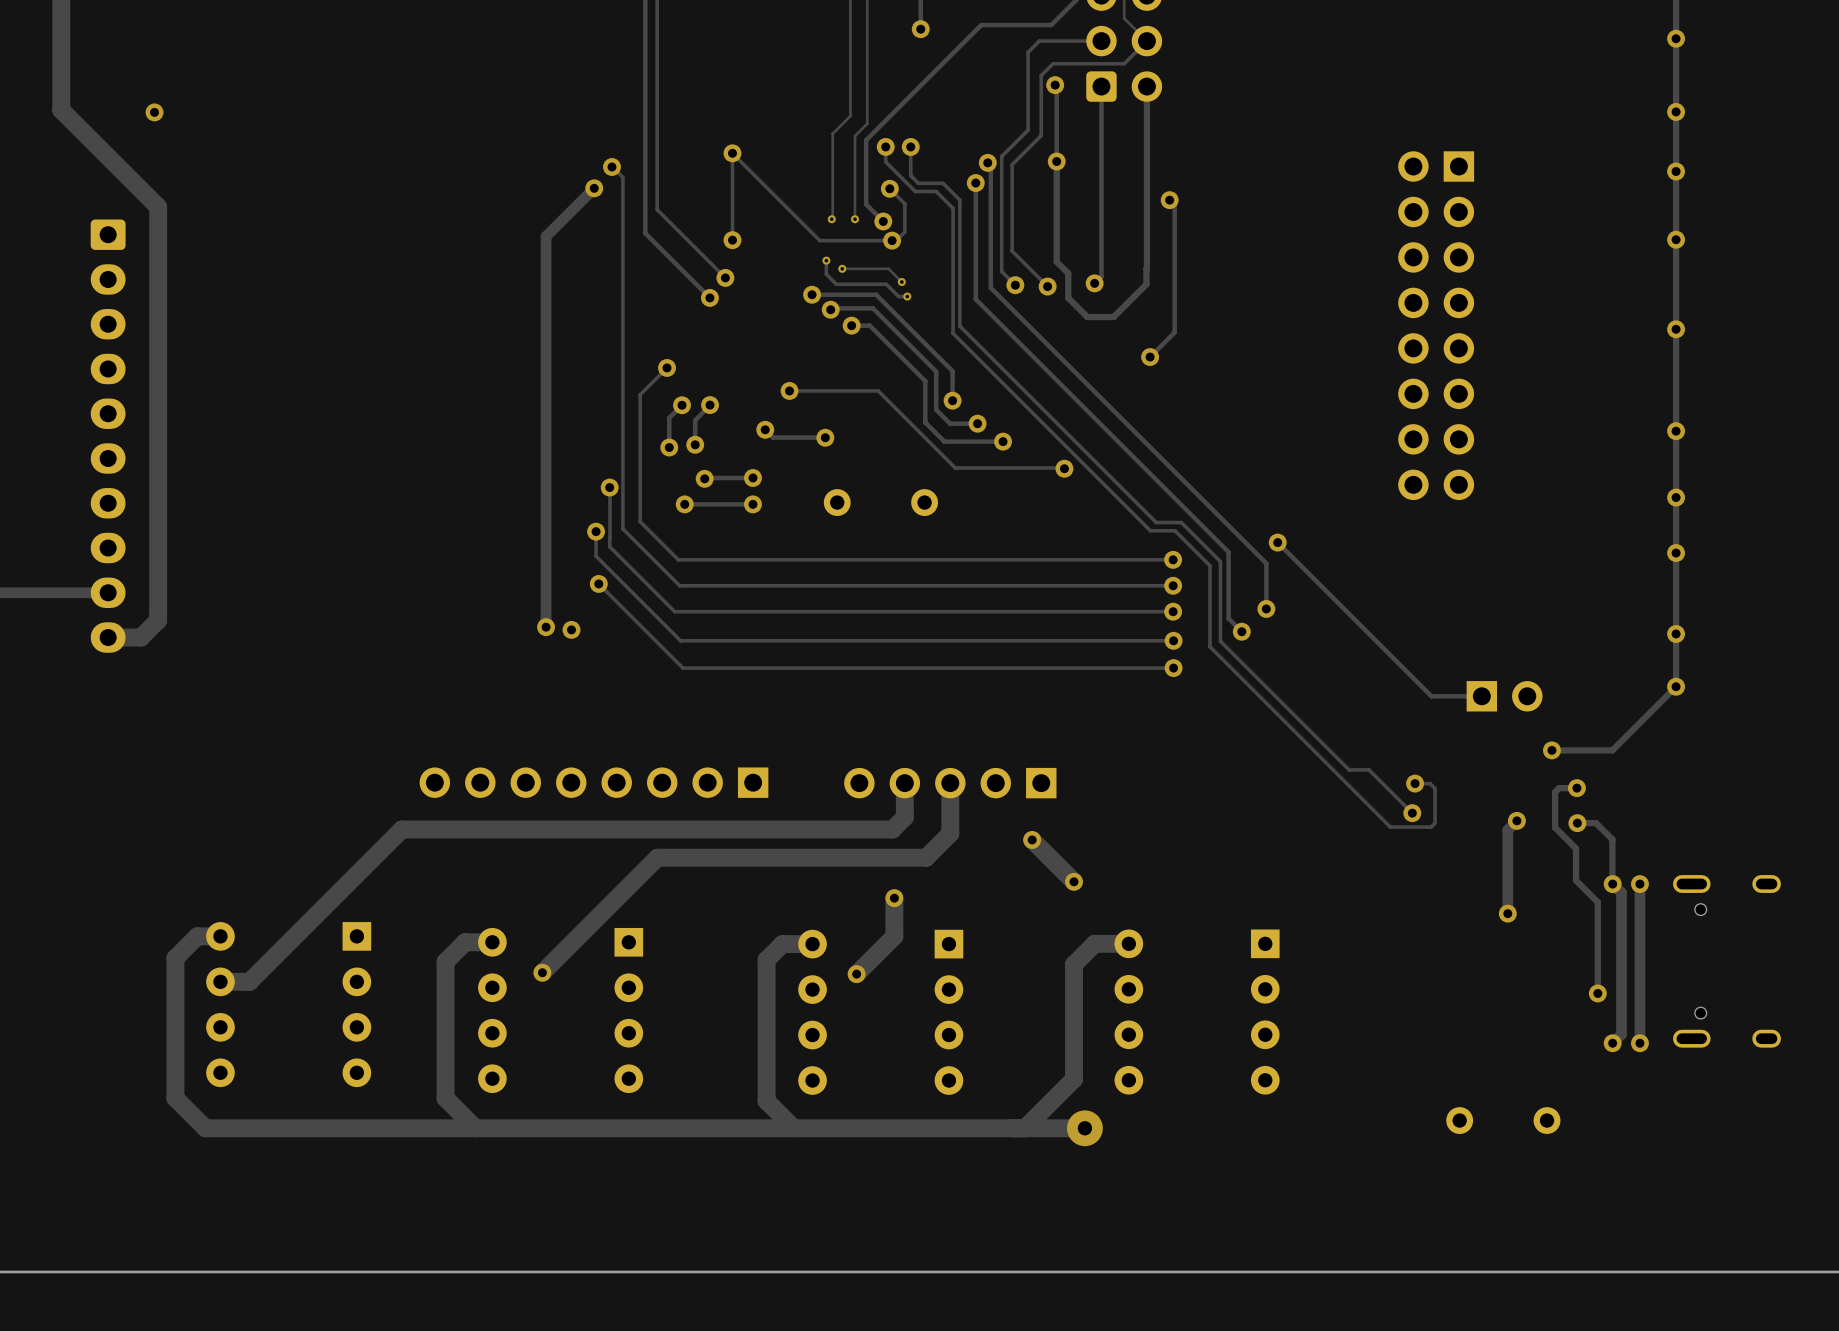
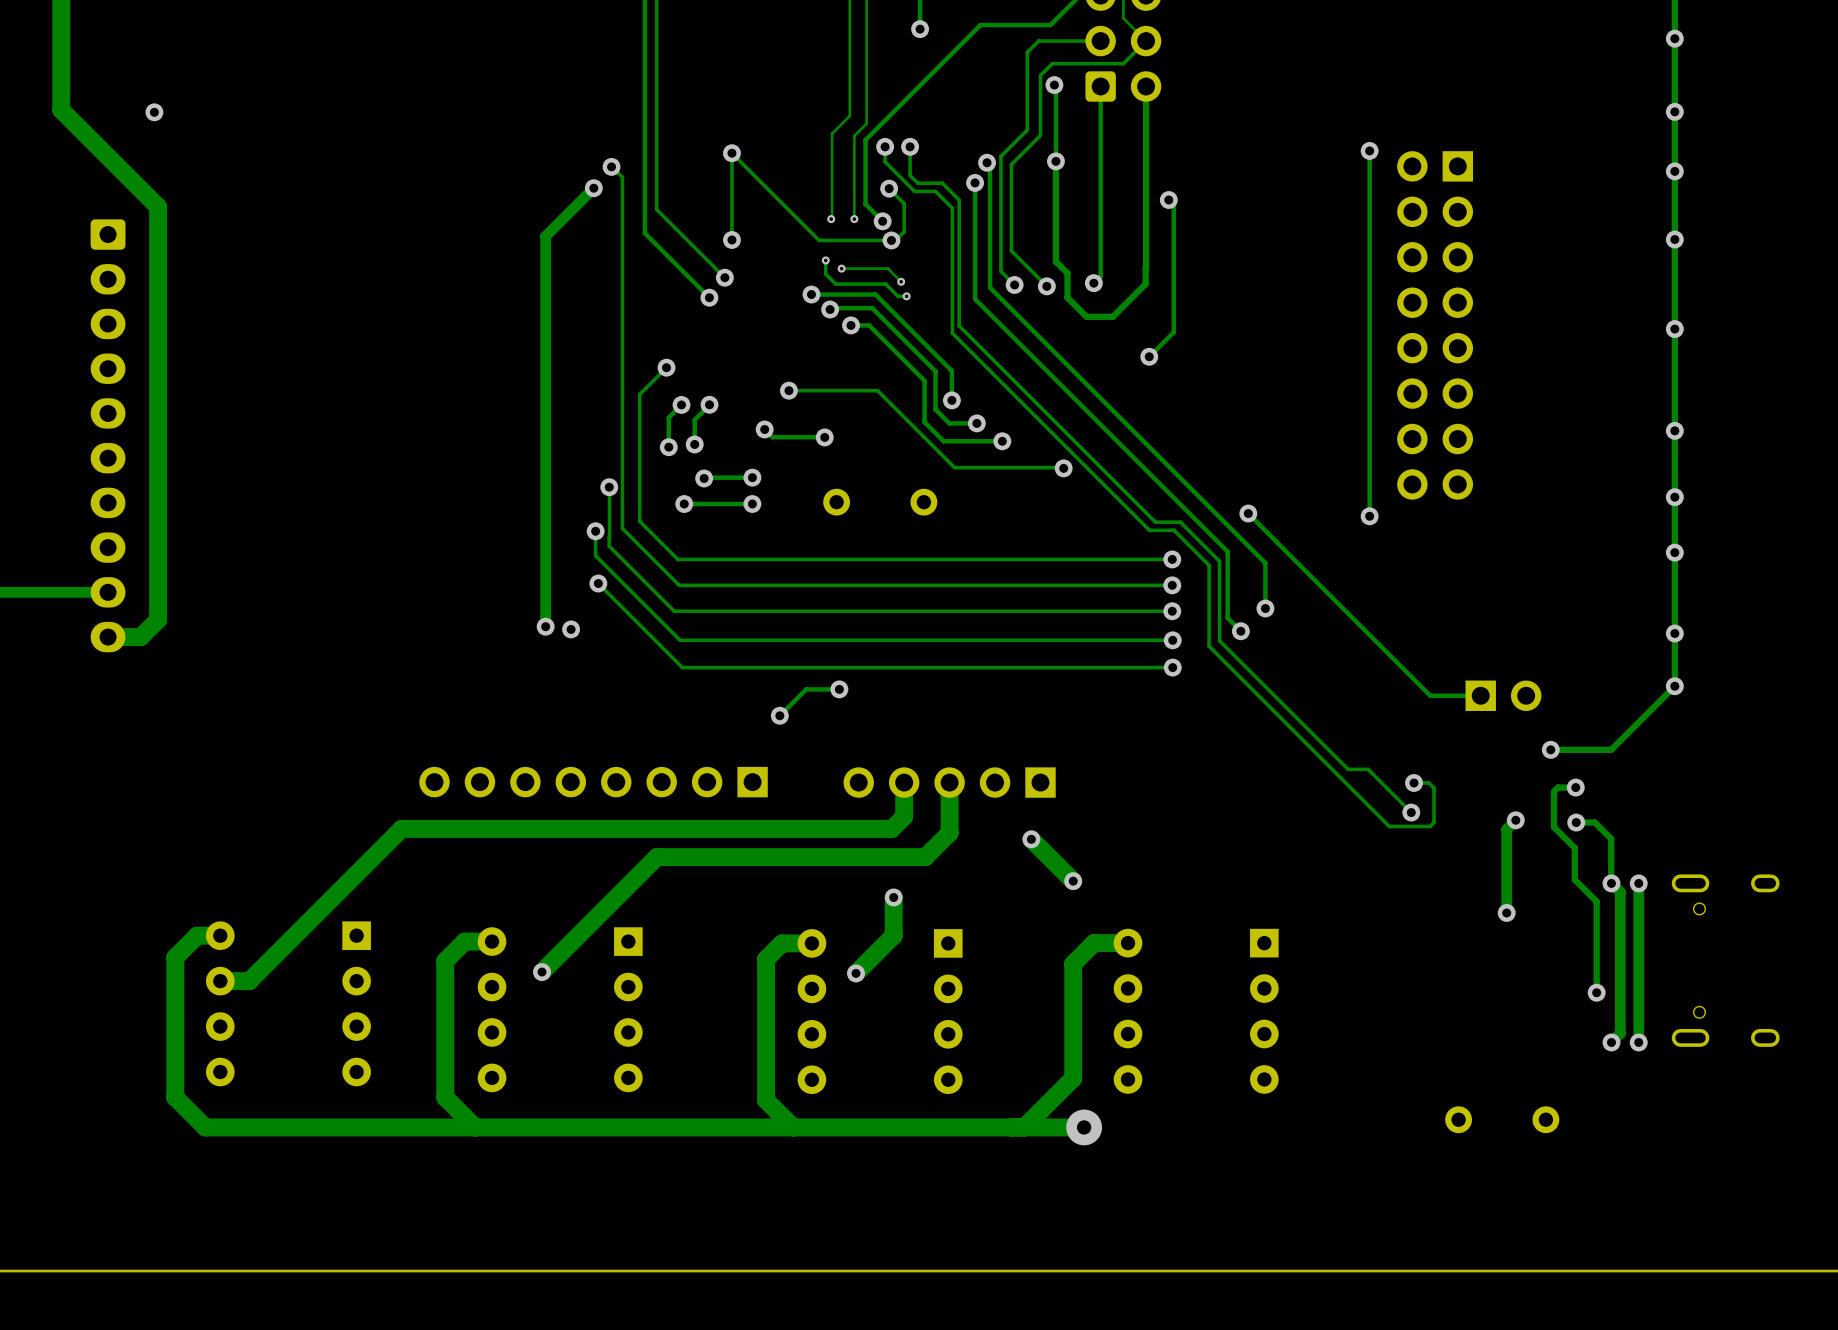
track: none -> (1369, 150) (1369, 516)
via: none -> (1369, 150)
track: none -> (1248, 513) (1276, 542)
via: none -> (1369, 516)
via position: (1277, 542) -> (1248, 513)
track: none -> (839, 689) (806, 689) (779, 715)
via: none -> (839, 689)
via: none -> (779, 715)

